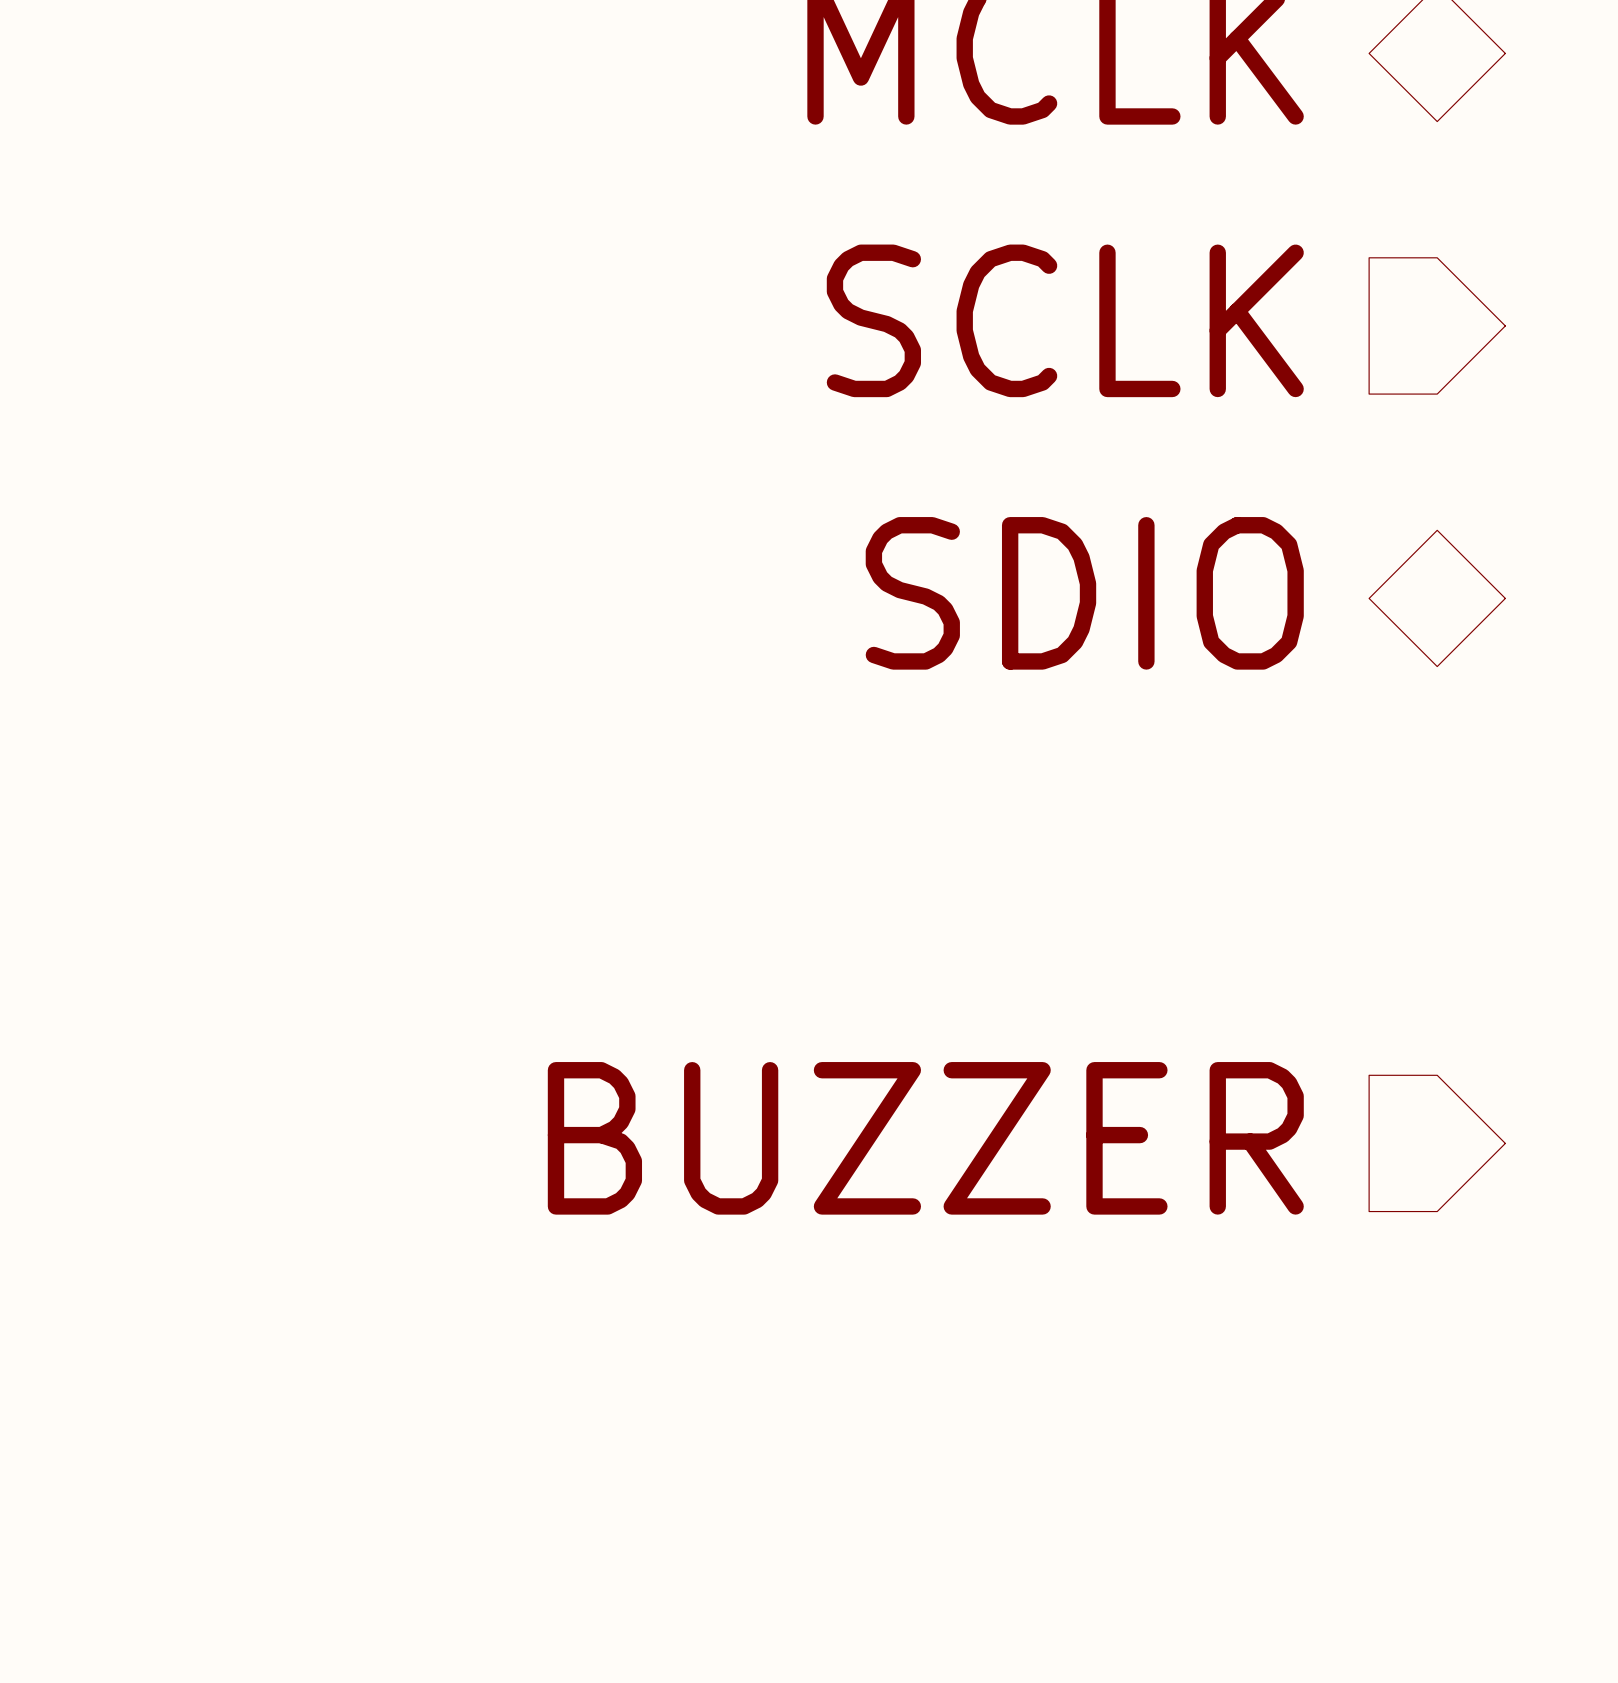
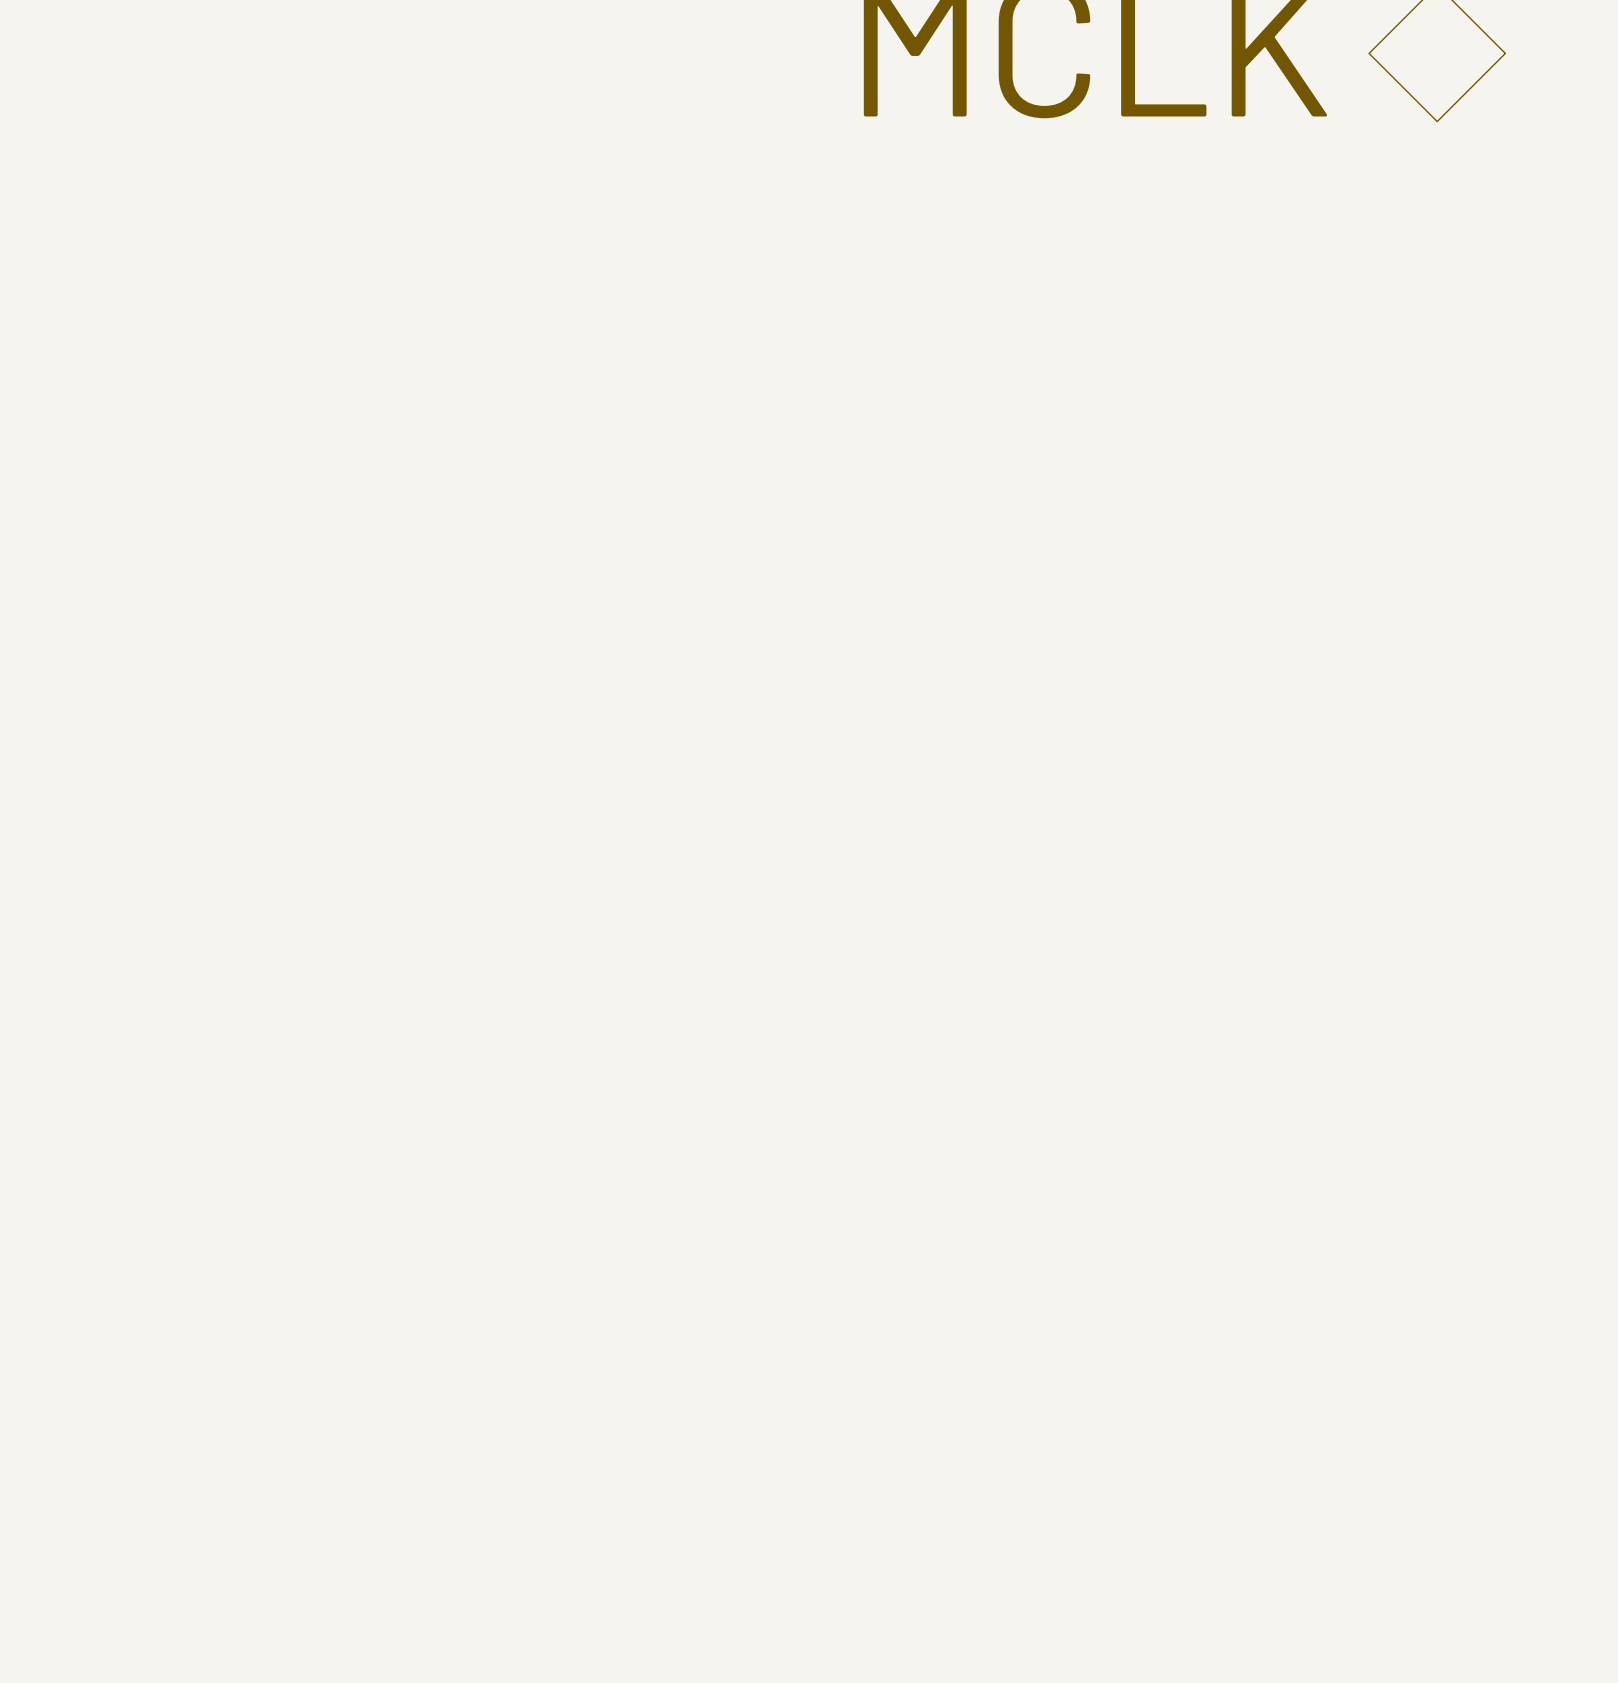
hierarchical label: SCLK (1065, 320) -> none
hierarchical label: SDIO (1084, 593) -> none
hierarchical label: BUZZER (925, 1138) -> none

